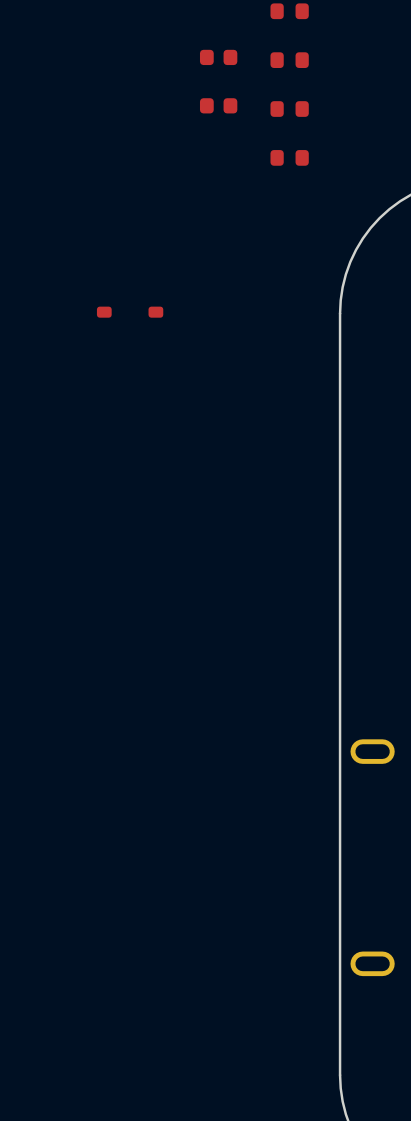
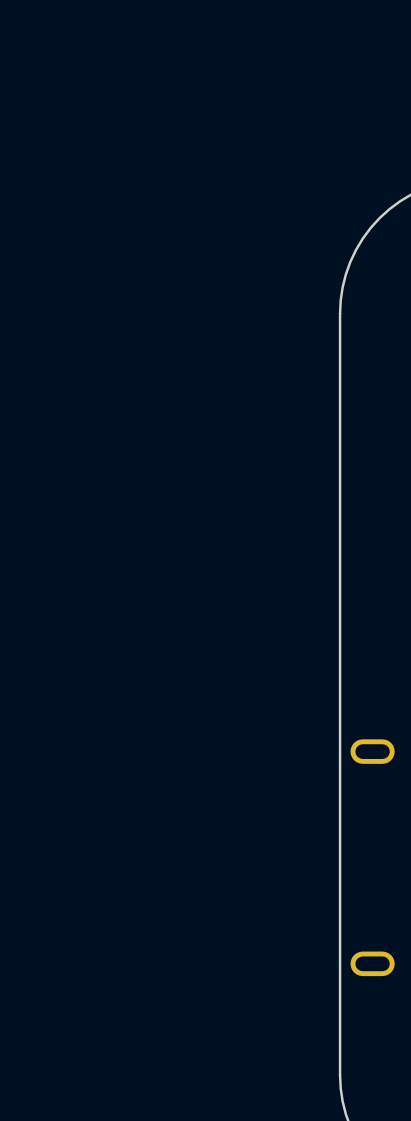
part: (289, 11) -> none
part: (218, 57) -> none
part: (289, 60) -> none
part: (218, 105) -> none
part: (289, 109) -> none
part: (289, 157) -> none
part: (130, 312) -> none

